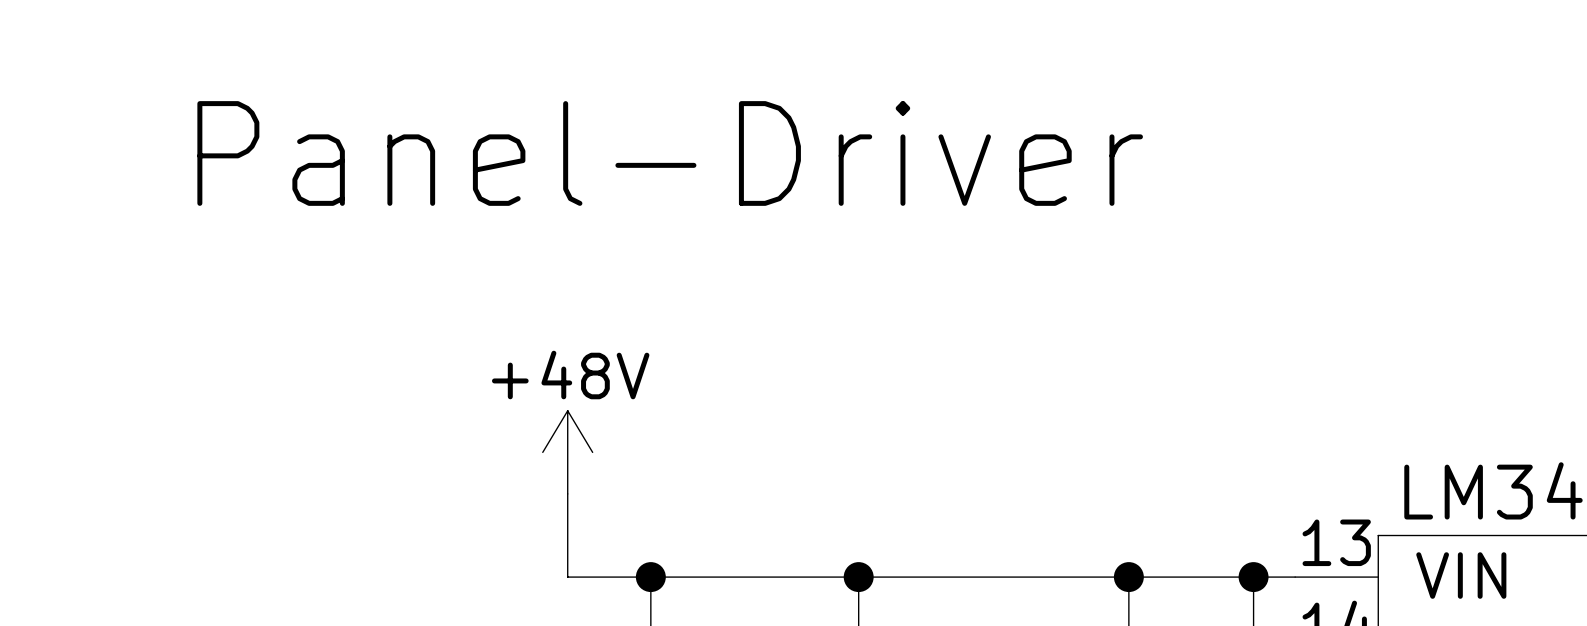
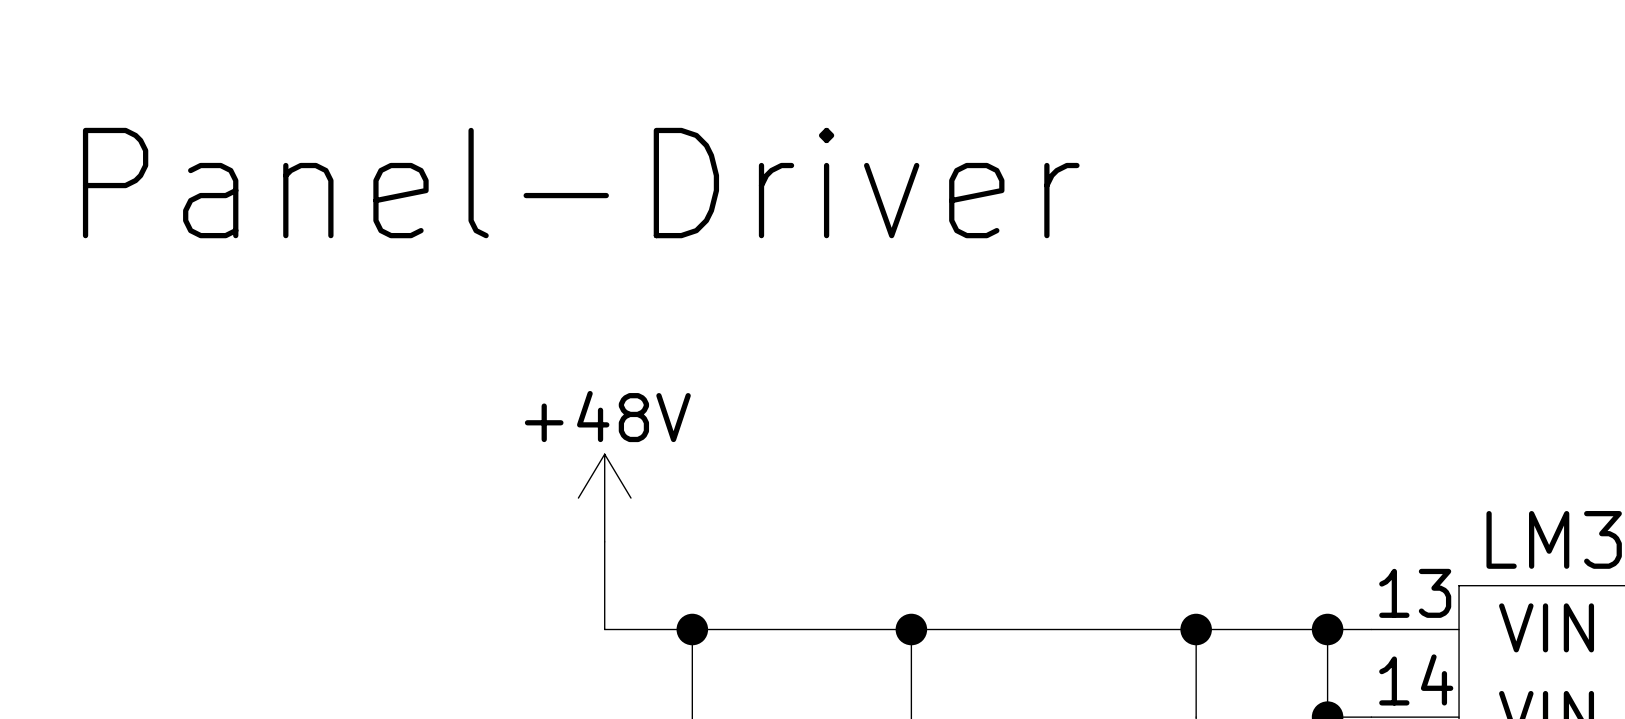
text position: Panel-Driver (670, 153) -> Panel-Driver (581, 183)

